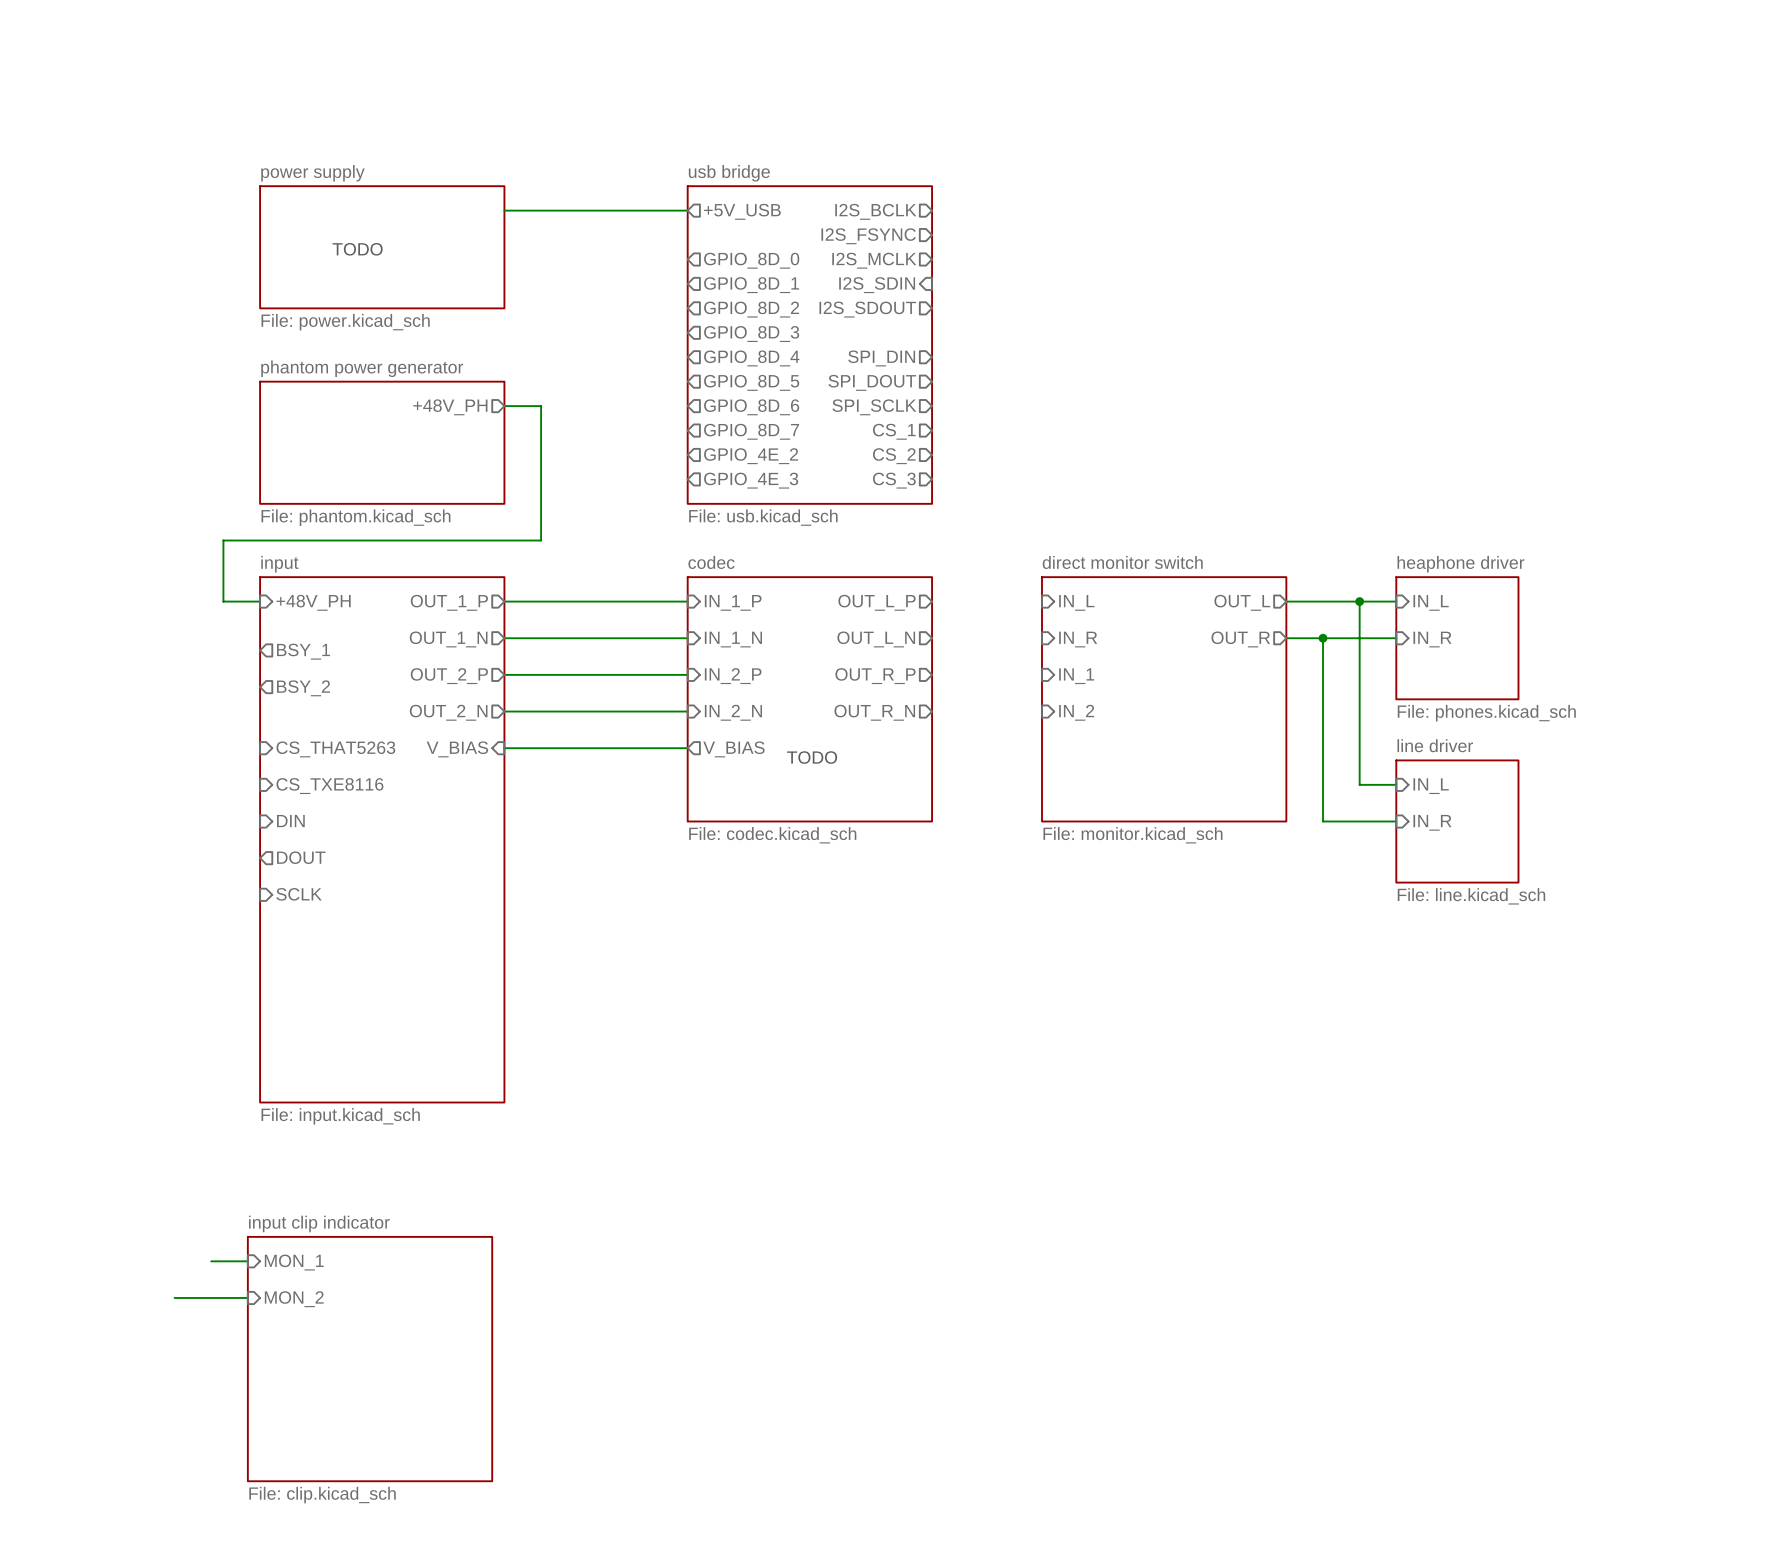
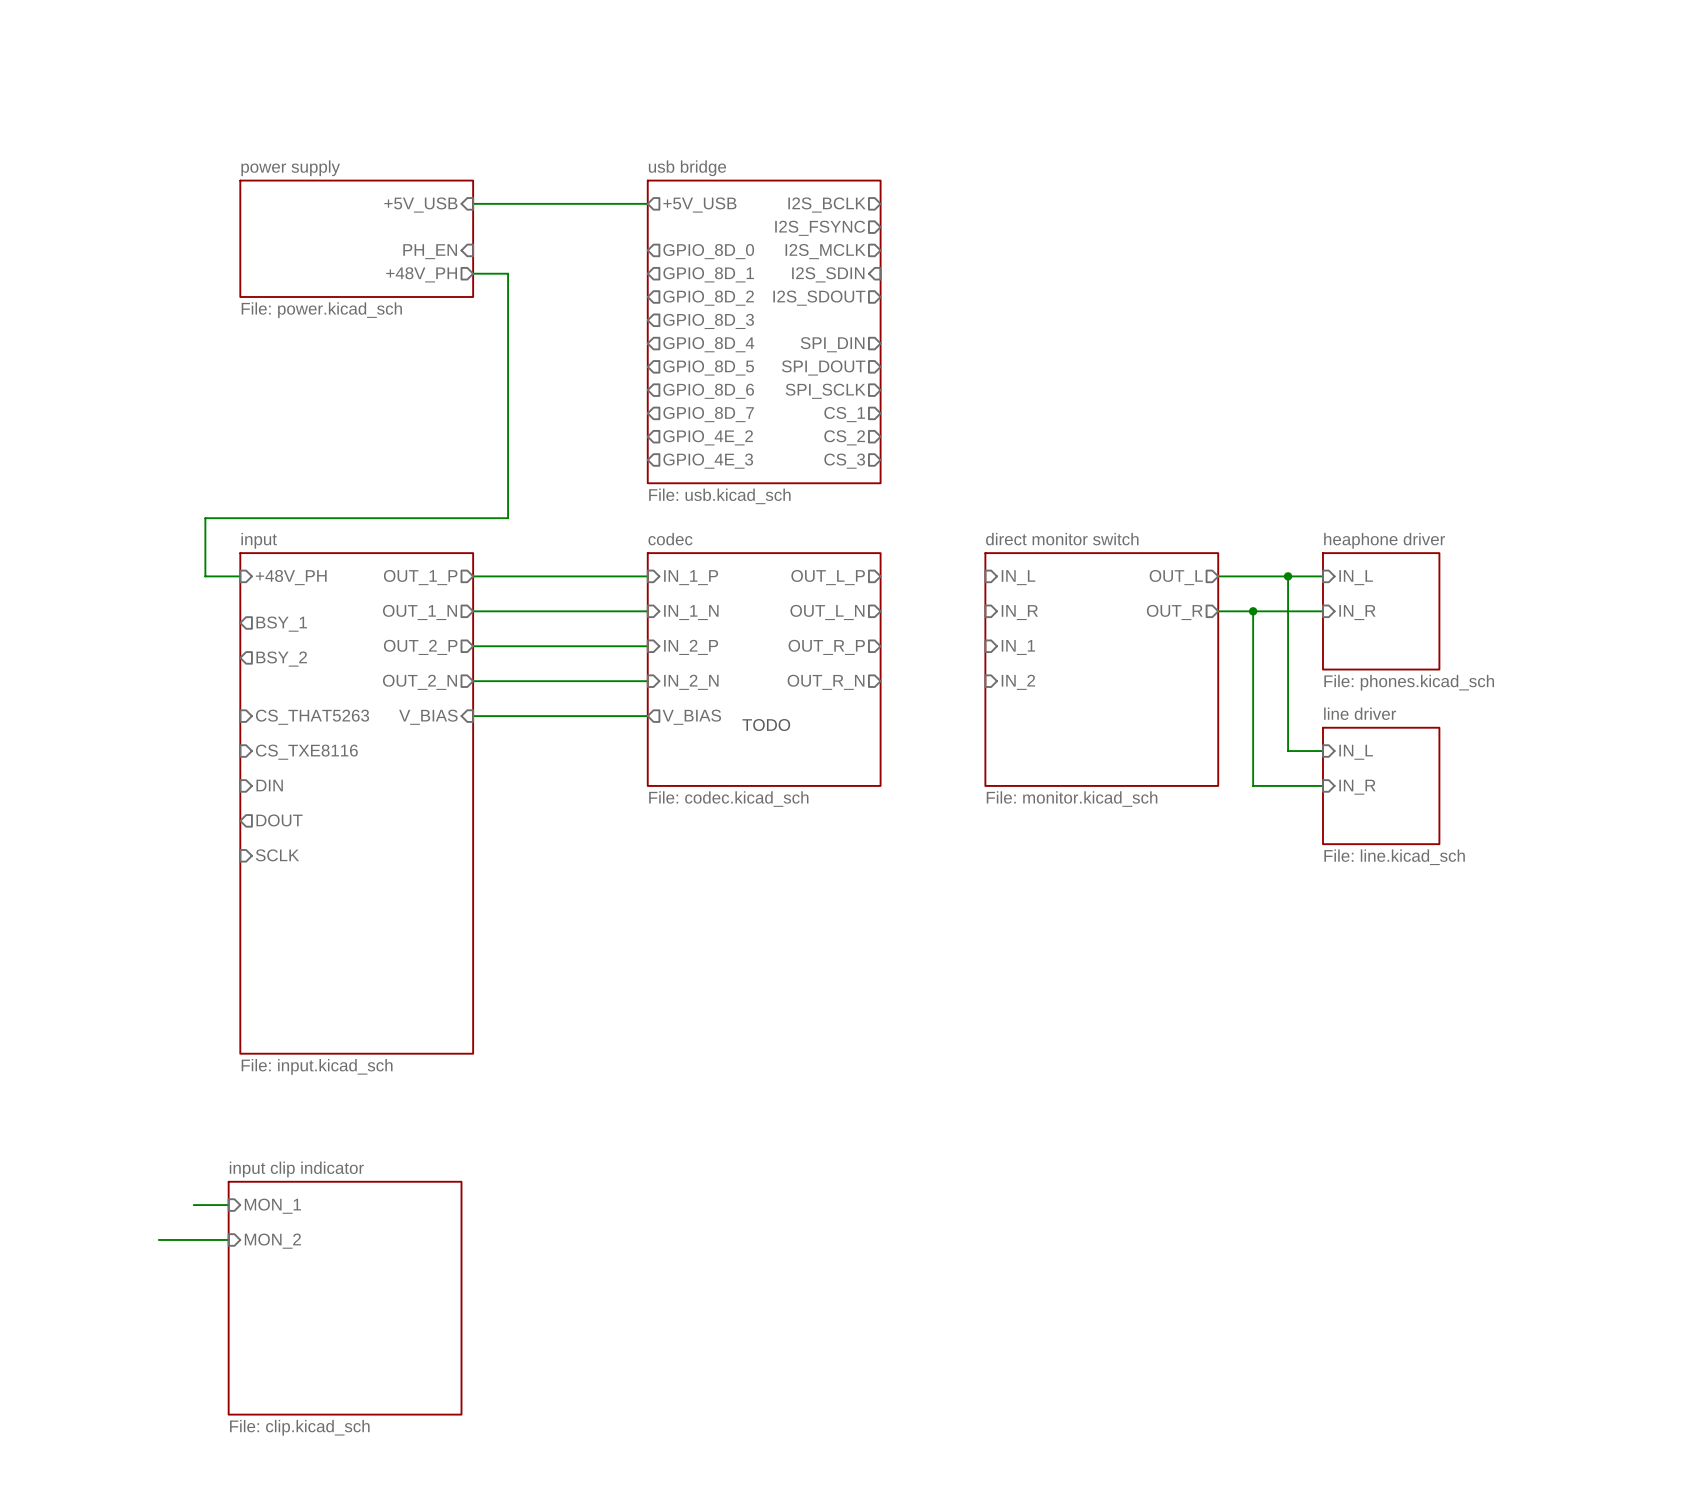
sheet pin: none -> +5V_USB (420, 205)
text: TODO (357, 249) -> none
sheet pin: none -> PH_EN (430, 251)
wire: (504, 406) (541, 406) -> (473, 273) (508, 273) (508, 390)
sheet pin position: +48V_PH (450, 407) -> +48V_PH (421, 274)
sheet phantom power generator: File: phantom.kicad_sch (382, 442) -> none

